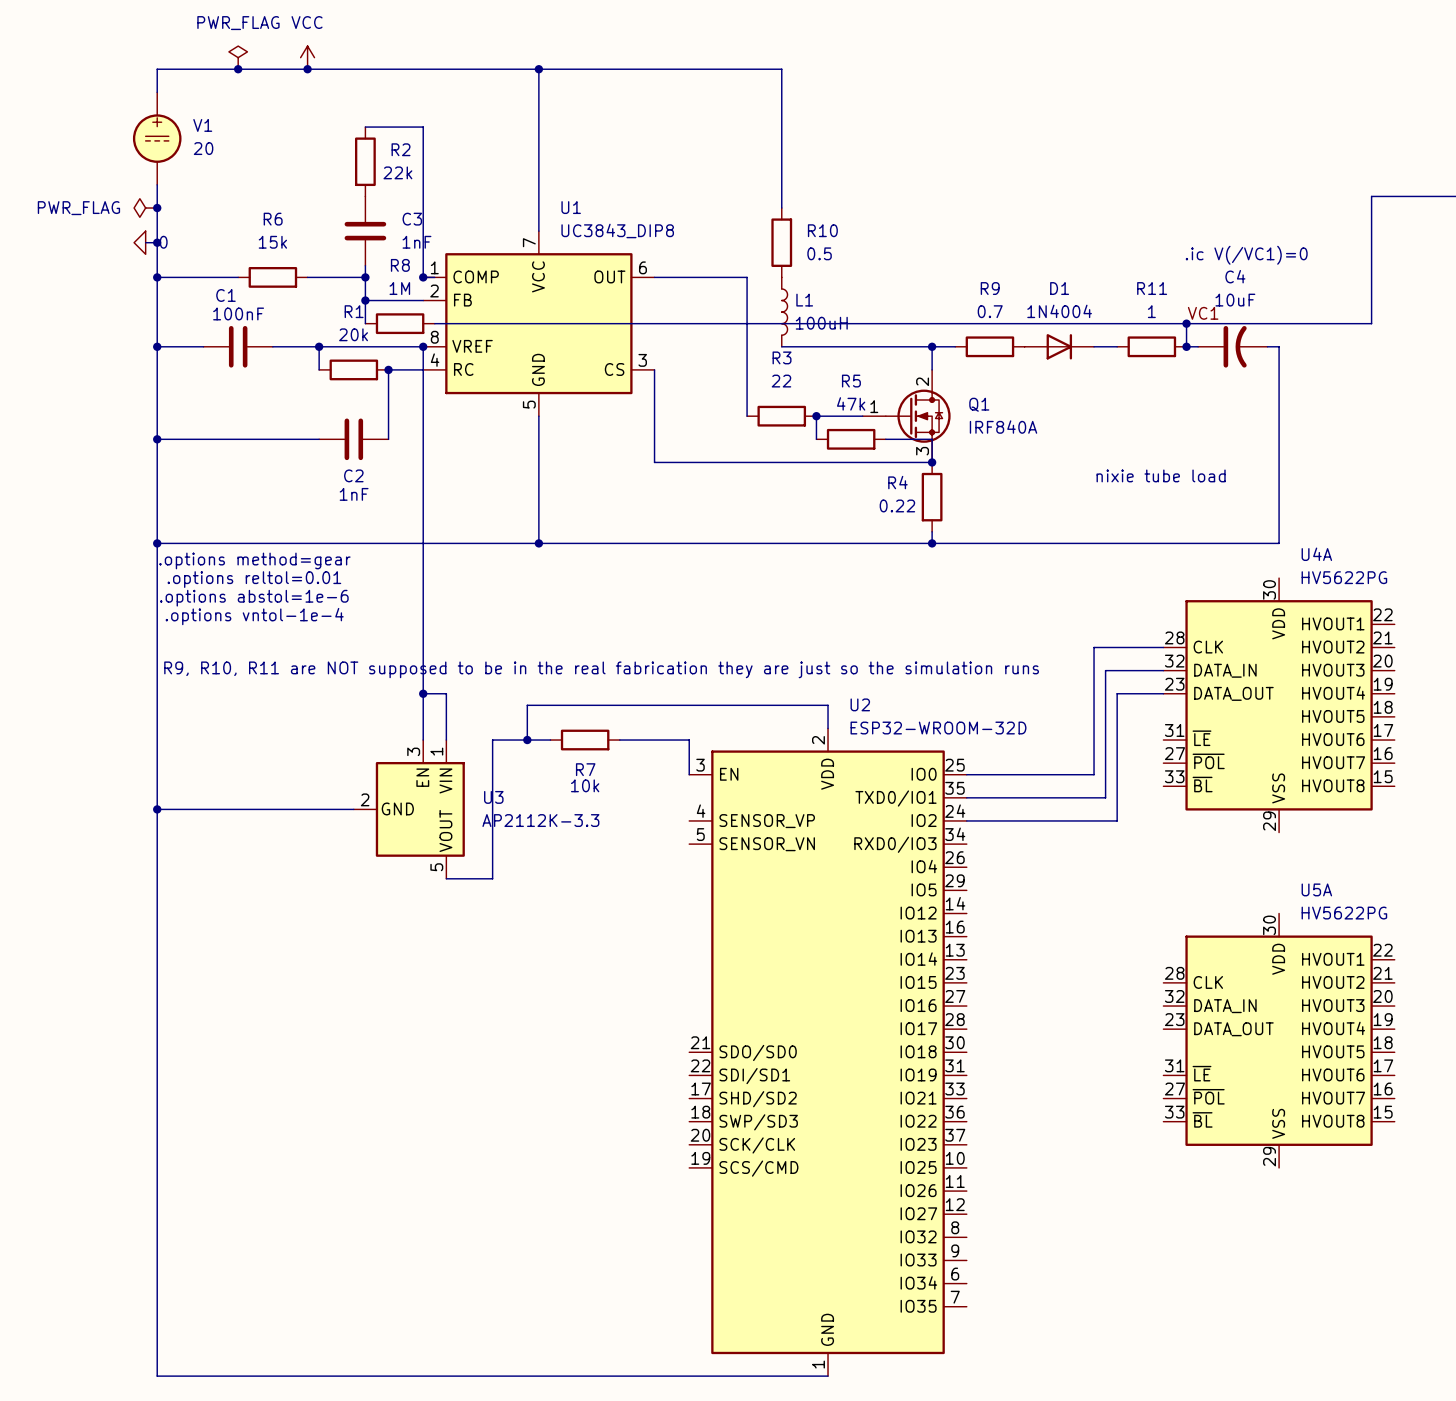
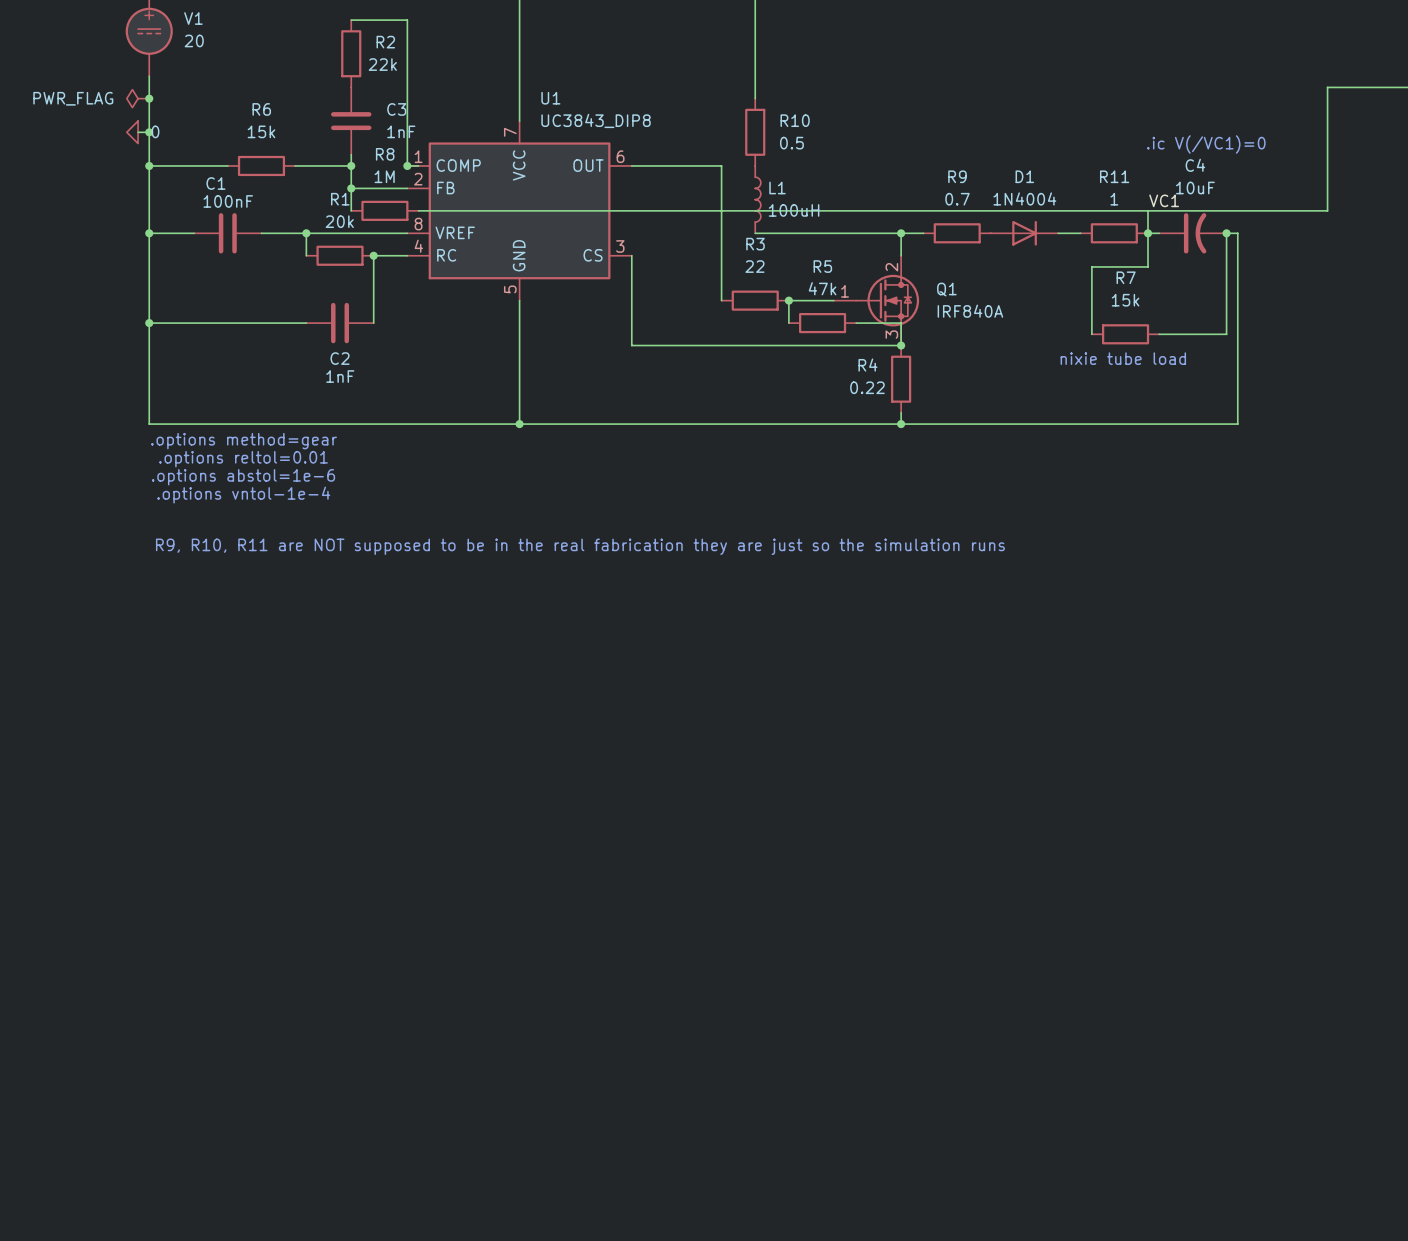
junction: (1186, 323) -> none
wire: (423, 346) (423, 740) -> none
junction: (423, 346) -> none
wire: none -> (1148, 233) (1148, 266) (1091, 266) (1091, 334)
wire: none -> (1226, 233) (1226, 334) (1159, 334)
junction: none -> (1226, 233)
wire: (157, 543) (157, 1376) (828, 1376) -> none
junction: (157, 543) -> none
wire: (1163, 647) (1094, 647) (1094, 774) (966, 774) -> none
wire: (1163, 670) (1105, 670) (1105, 797) (966, 797) -> none
wire: (423, 693) (446, 693) (446, 740) -> none
junction: (423, 693) -> none
wire: (1163, 693) (1117, 693) (1117, 820) (966, 820) -> none
U4A: HV5622PG (1279, 705) -> none
wire: (828, 728) (828, 705) (527, 705) (527, 740) -> none
junction: (527, 740) -> none
wire: (550, 740) (492, 740) (492, 878) (446, 878) -> none
R7 position: (585, 740) -> (1125, 334)
wire: (619, 740) (689, 740) (689, 774) -> none
R7 name position: R7 (585, 769) -> R7 (1126, 277)
R7 value: 10k (585, 785) -> 15k (1125, 300)
wire: (157, 809) (353, 809) -> none
junction: (157, 809) -> none
U3: AP2112K-3.3 (409, 809) -> none
U5A: HV5622PG (1279, 1040) -> none
U2: ESP32-WROOM-32D (828, 1052) -> none

